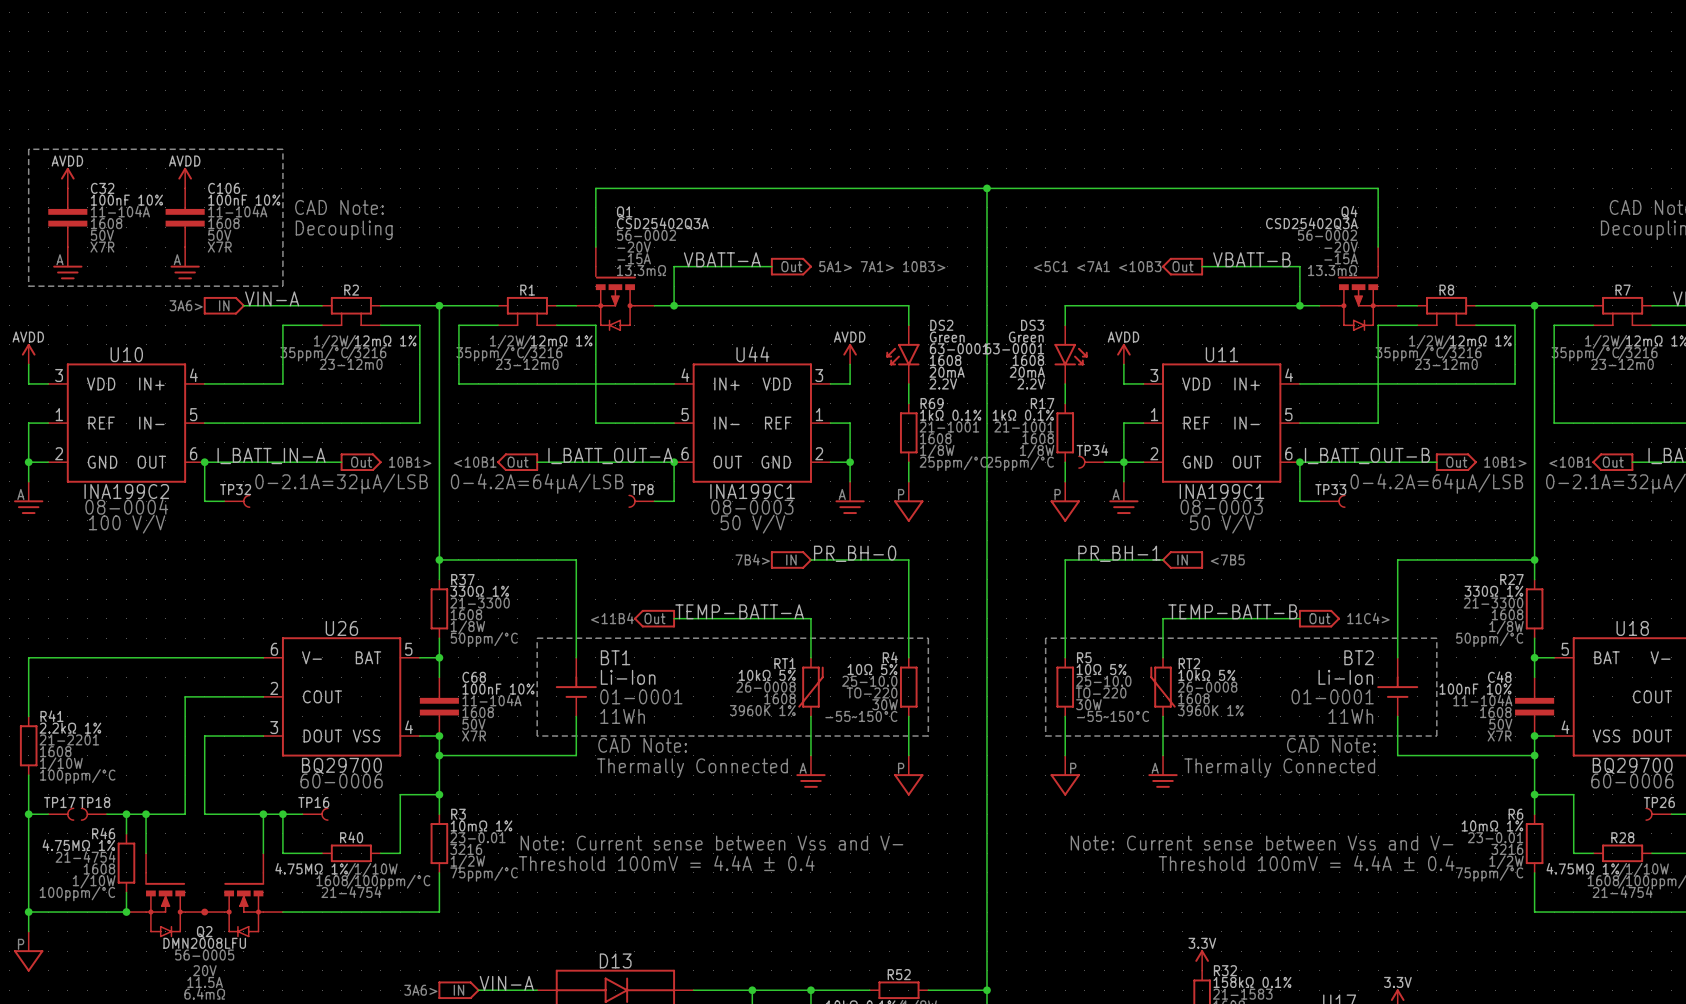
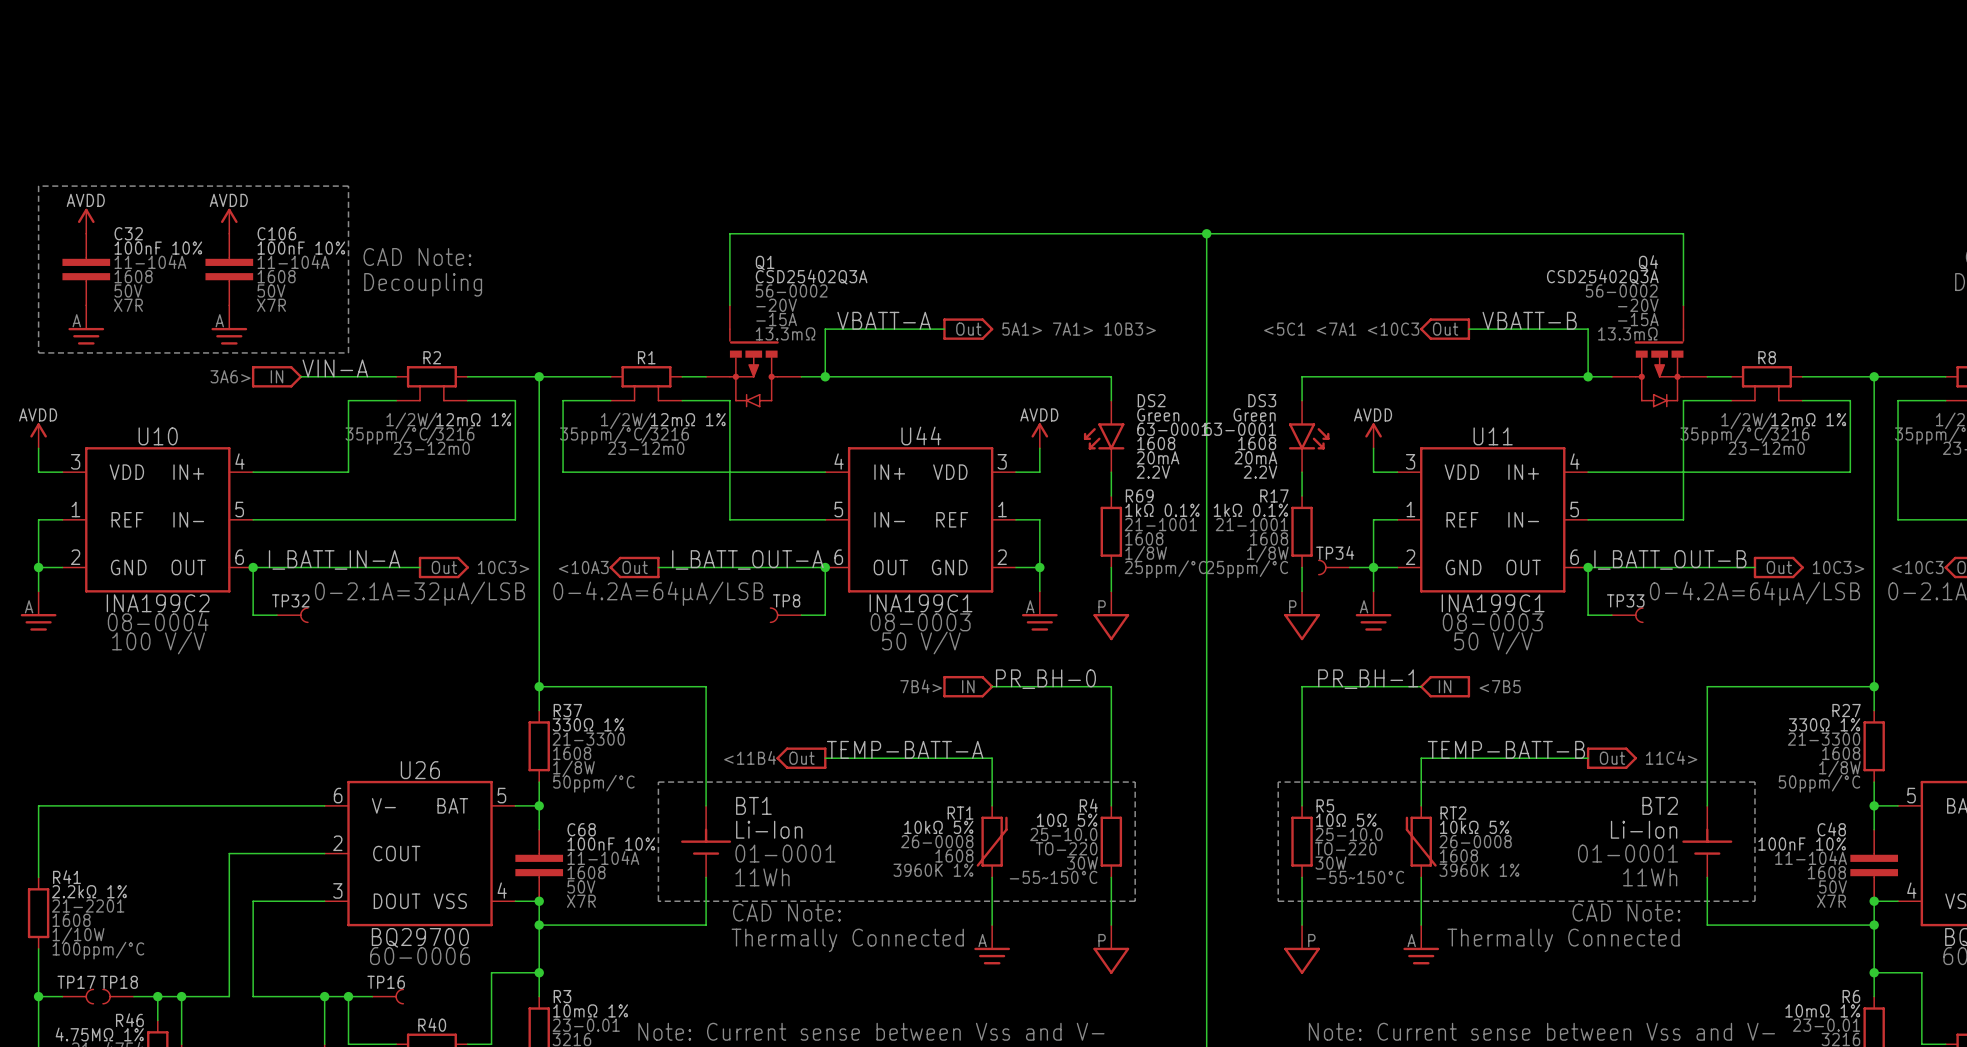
text: <5C1 <7A1 <10B3 (1097, 266) -> <5C1 <7A1 <10C3 (1341, 329)
text: 10B1> (410, 462) -> 10C3> (503, 567)
text: <10B1 (475, 462) -> <10A3 (583, 567)
text: 10B1> (1505, 462) -> 10C3> (1838, 567)
text: <10B1 (1570, 462) -> <10C3 (1917, 567)

